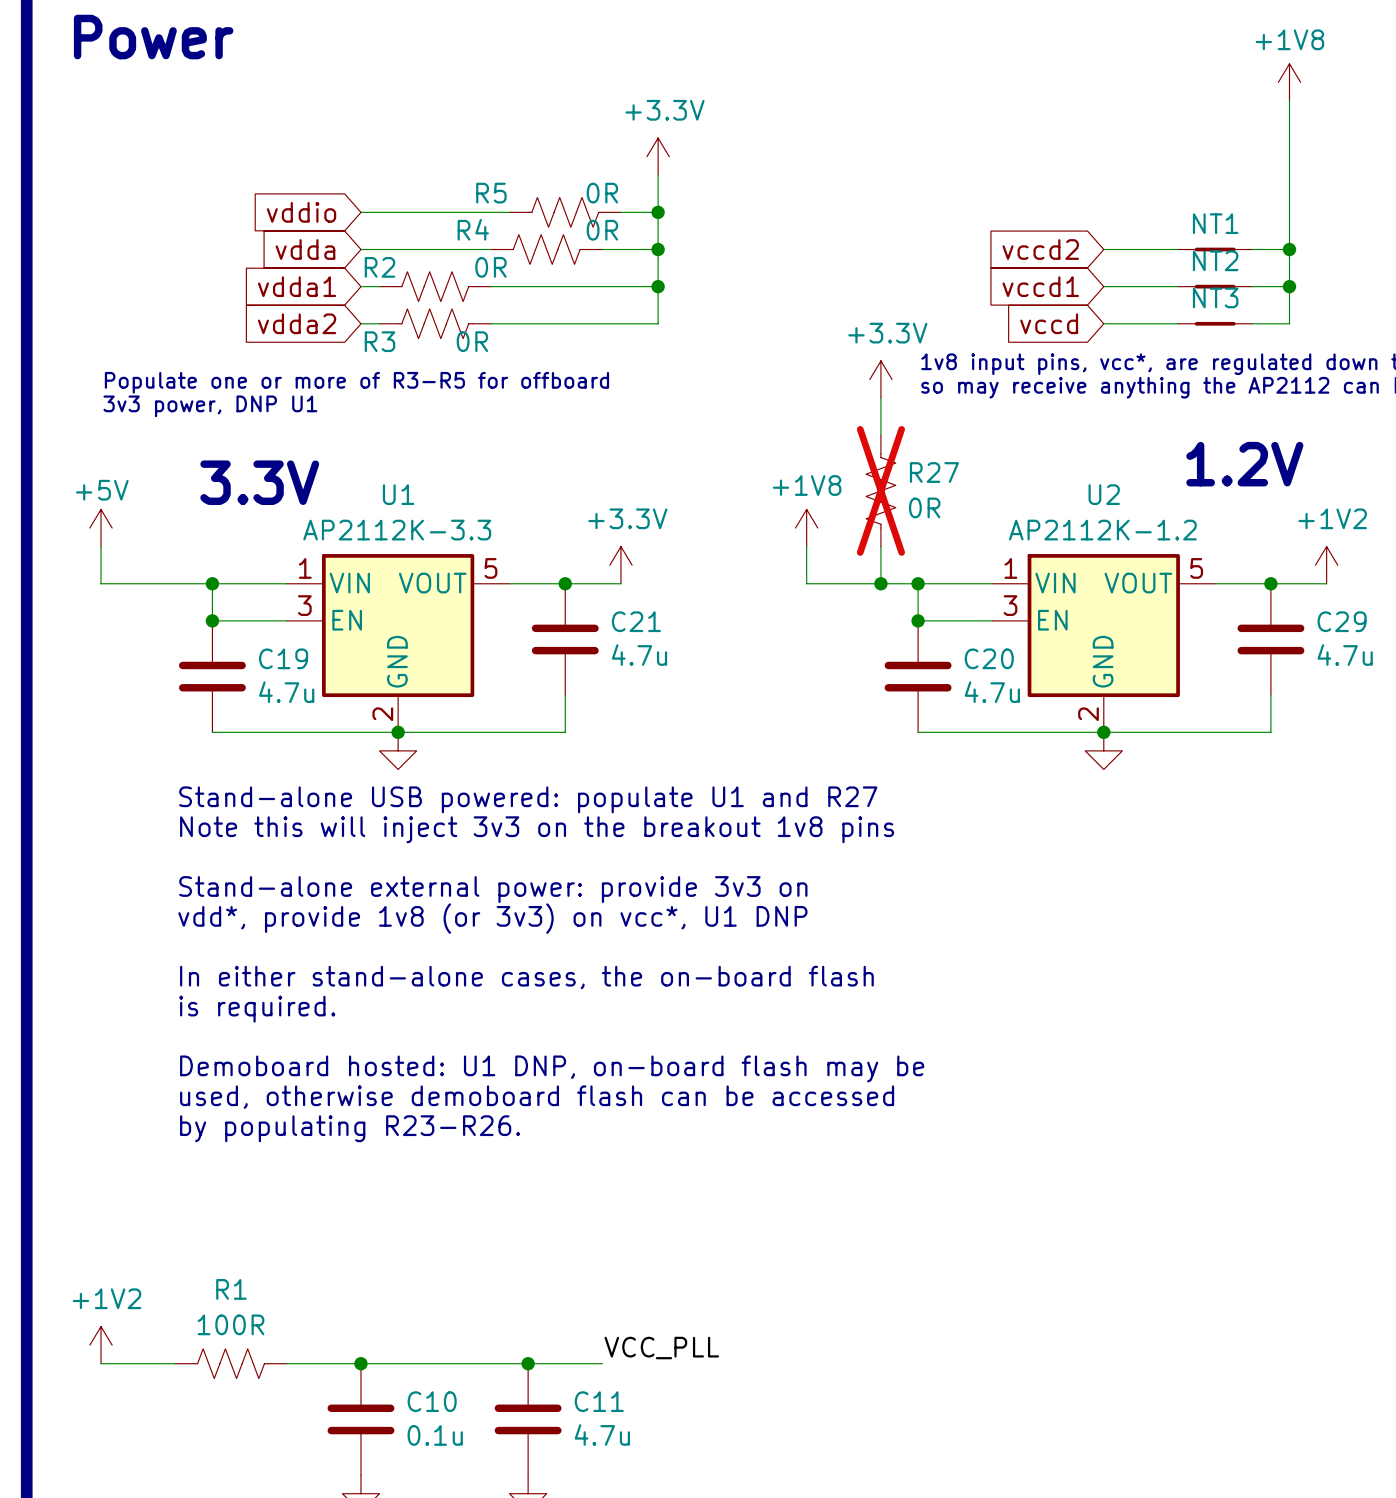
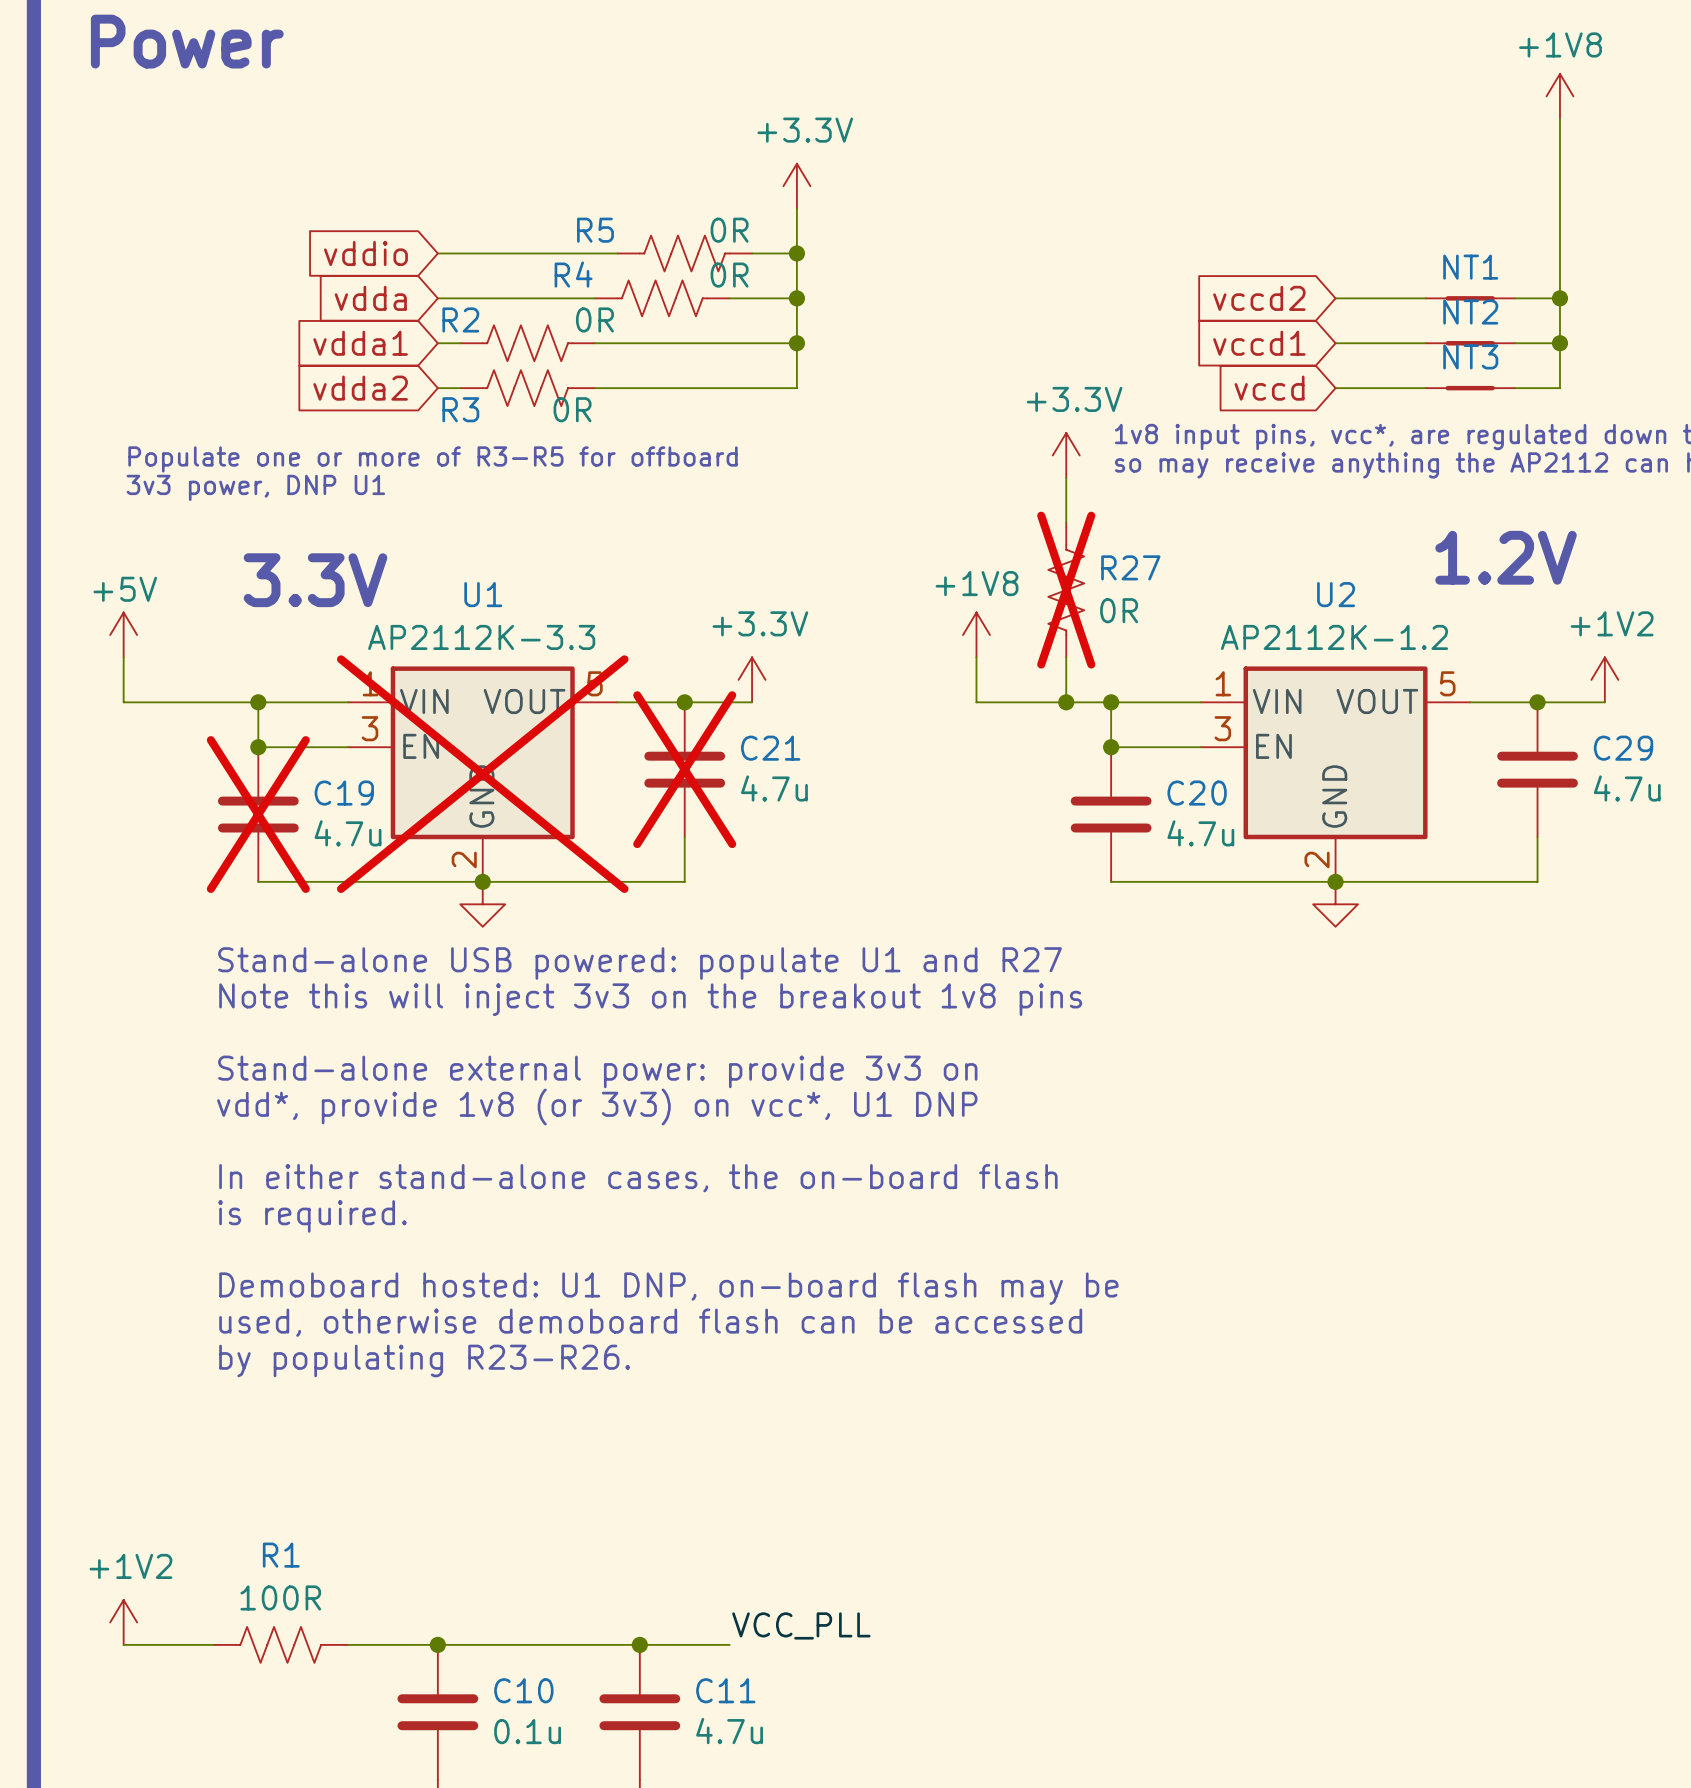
C21 do-not-place cross: none -> (684, 769)
U1 do-not-place cross: none -> (482, 774)
C19 do-not-place cross: none -> (258, 814)

